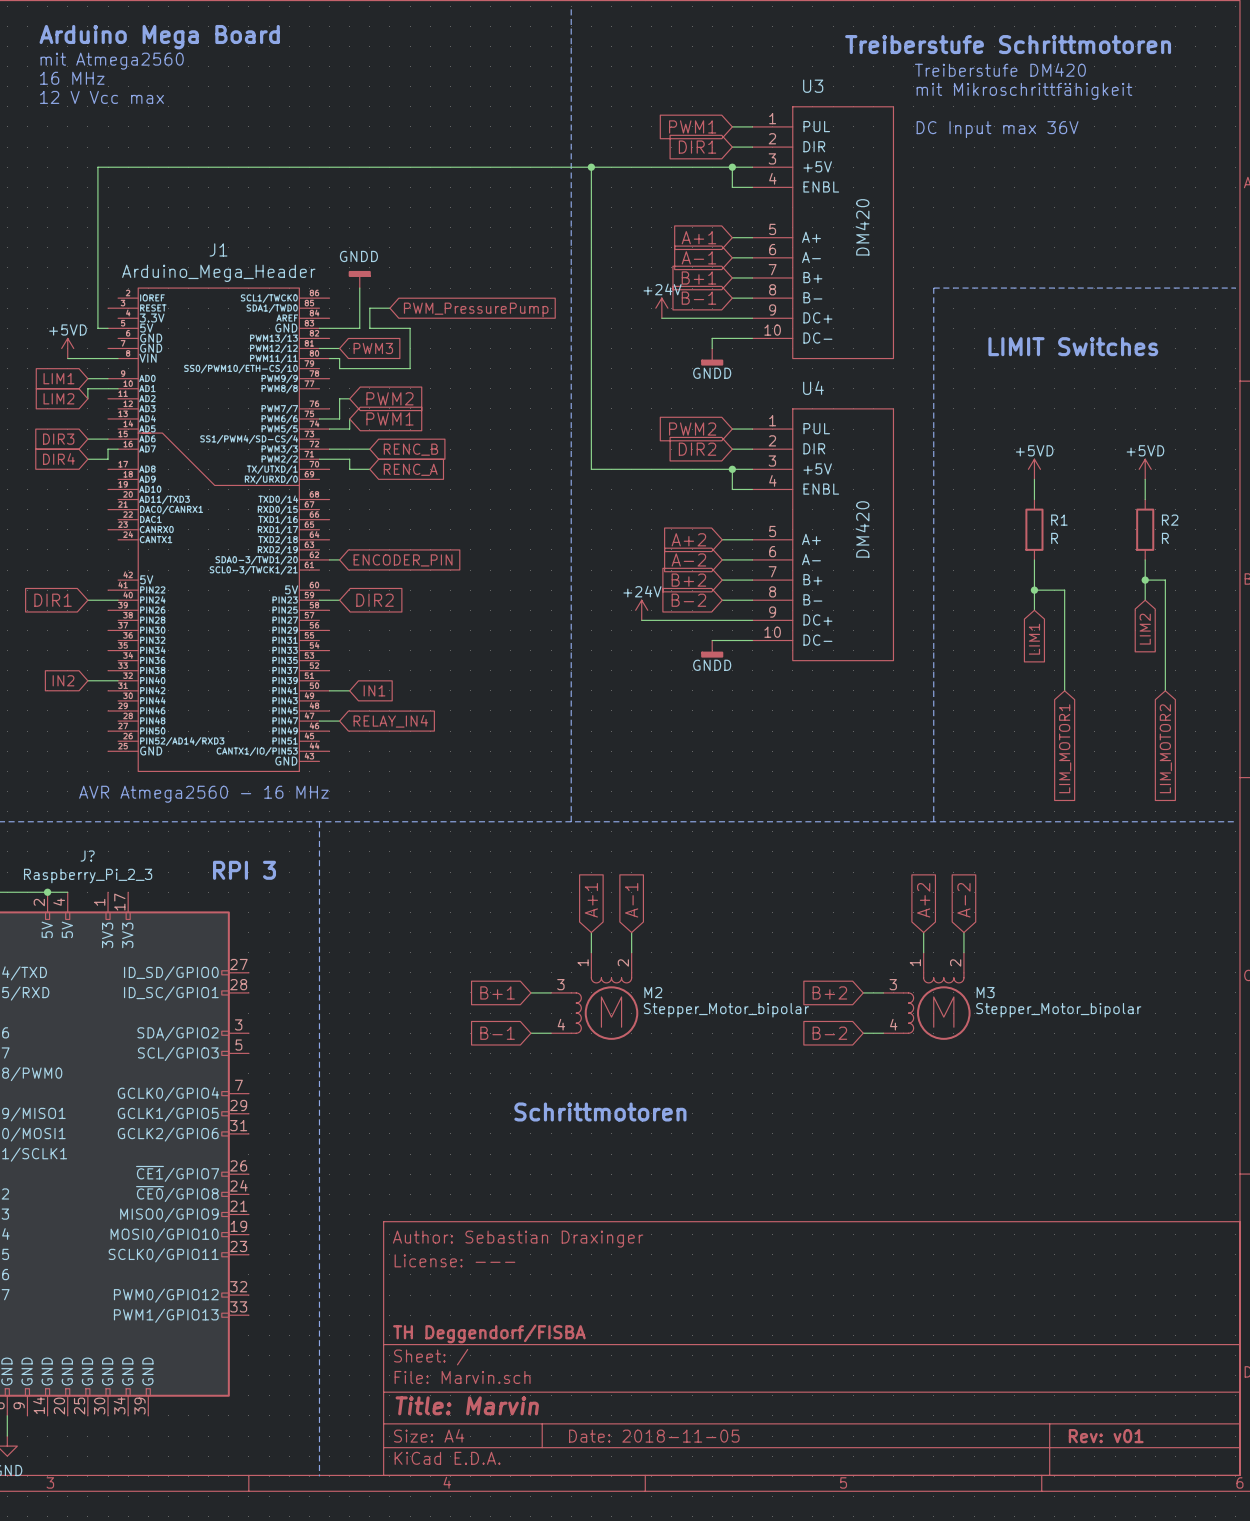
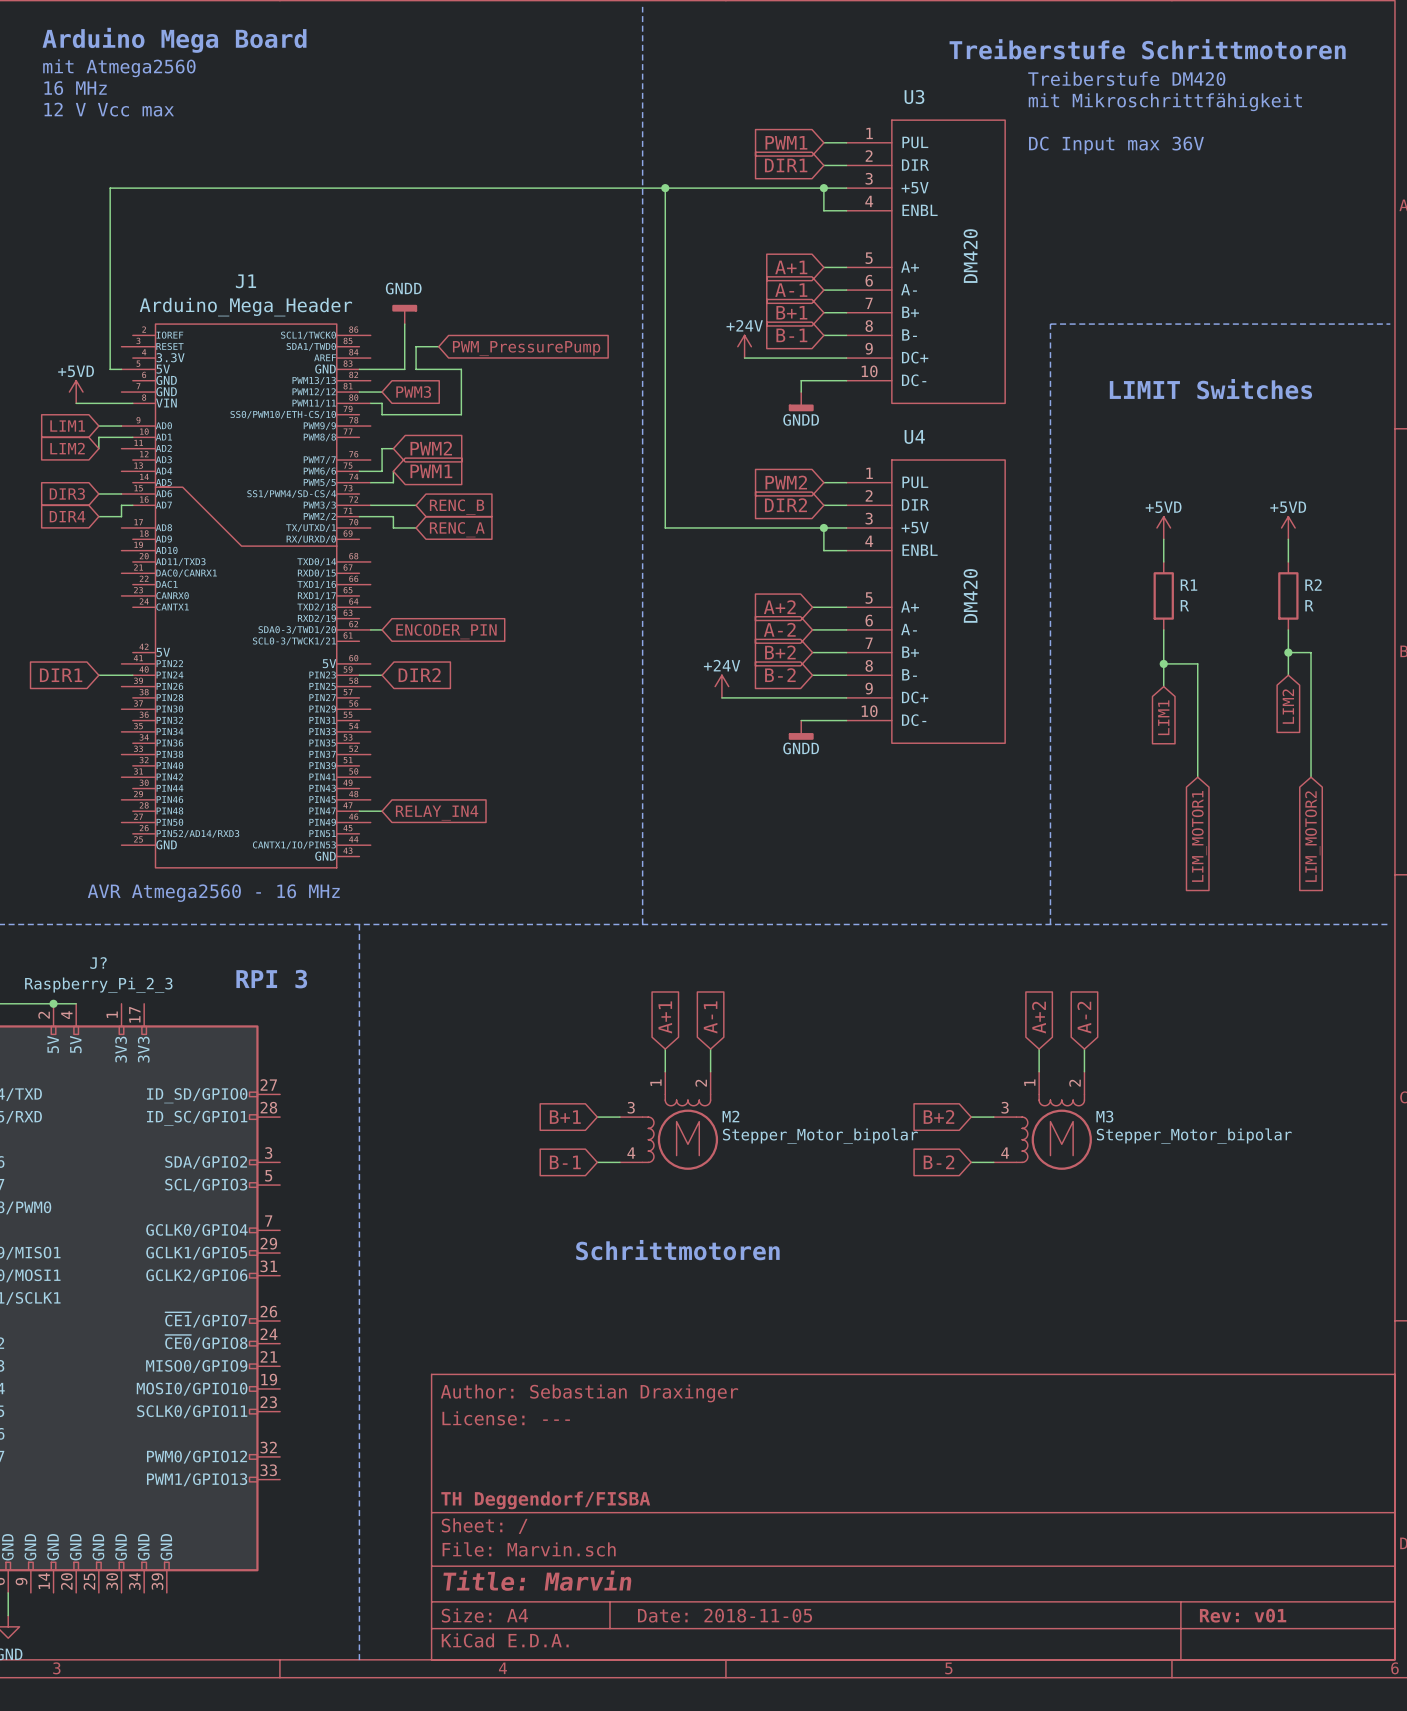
global label: IN2 (63, 680) -> none
wire: (87, 680) (118, 680) -> none
wire: (329, 690) (349, 690) -> none
global label: IN1 (374, 690) -> none

